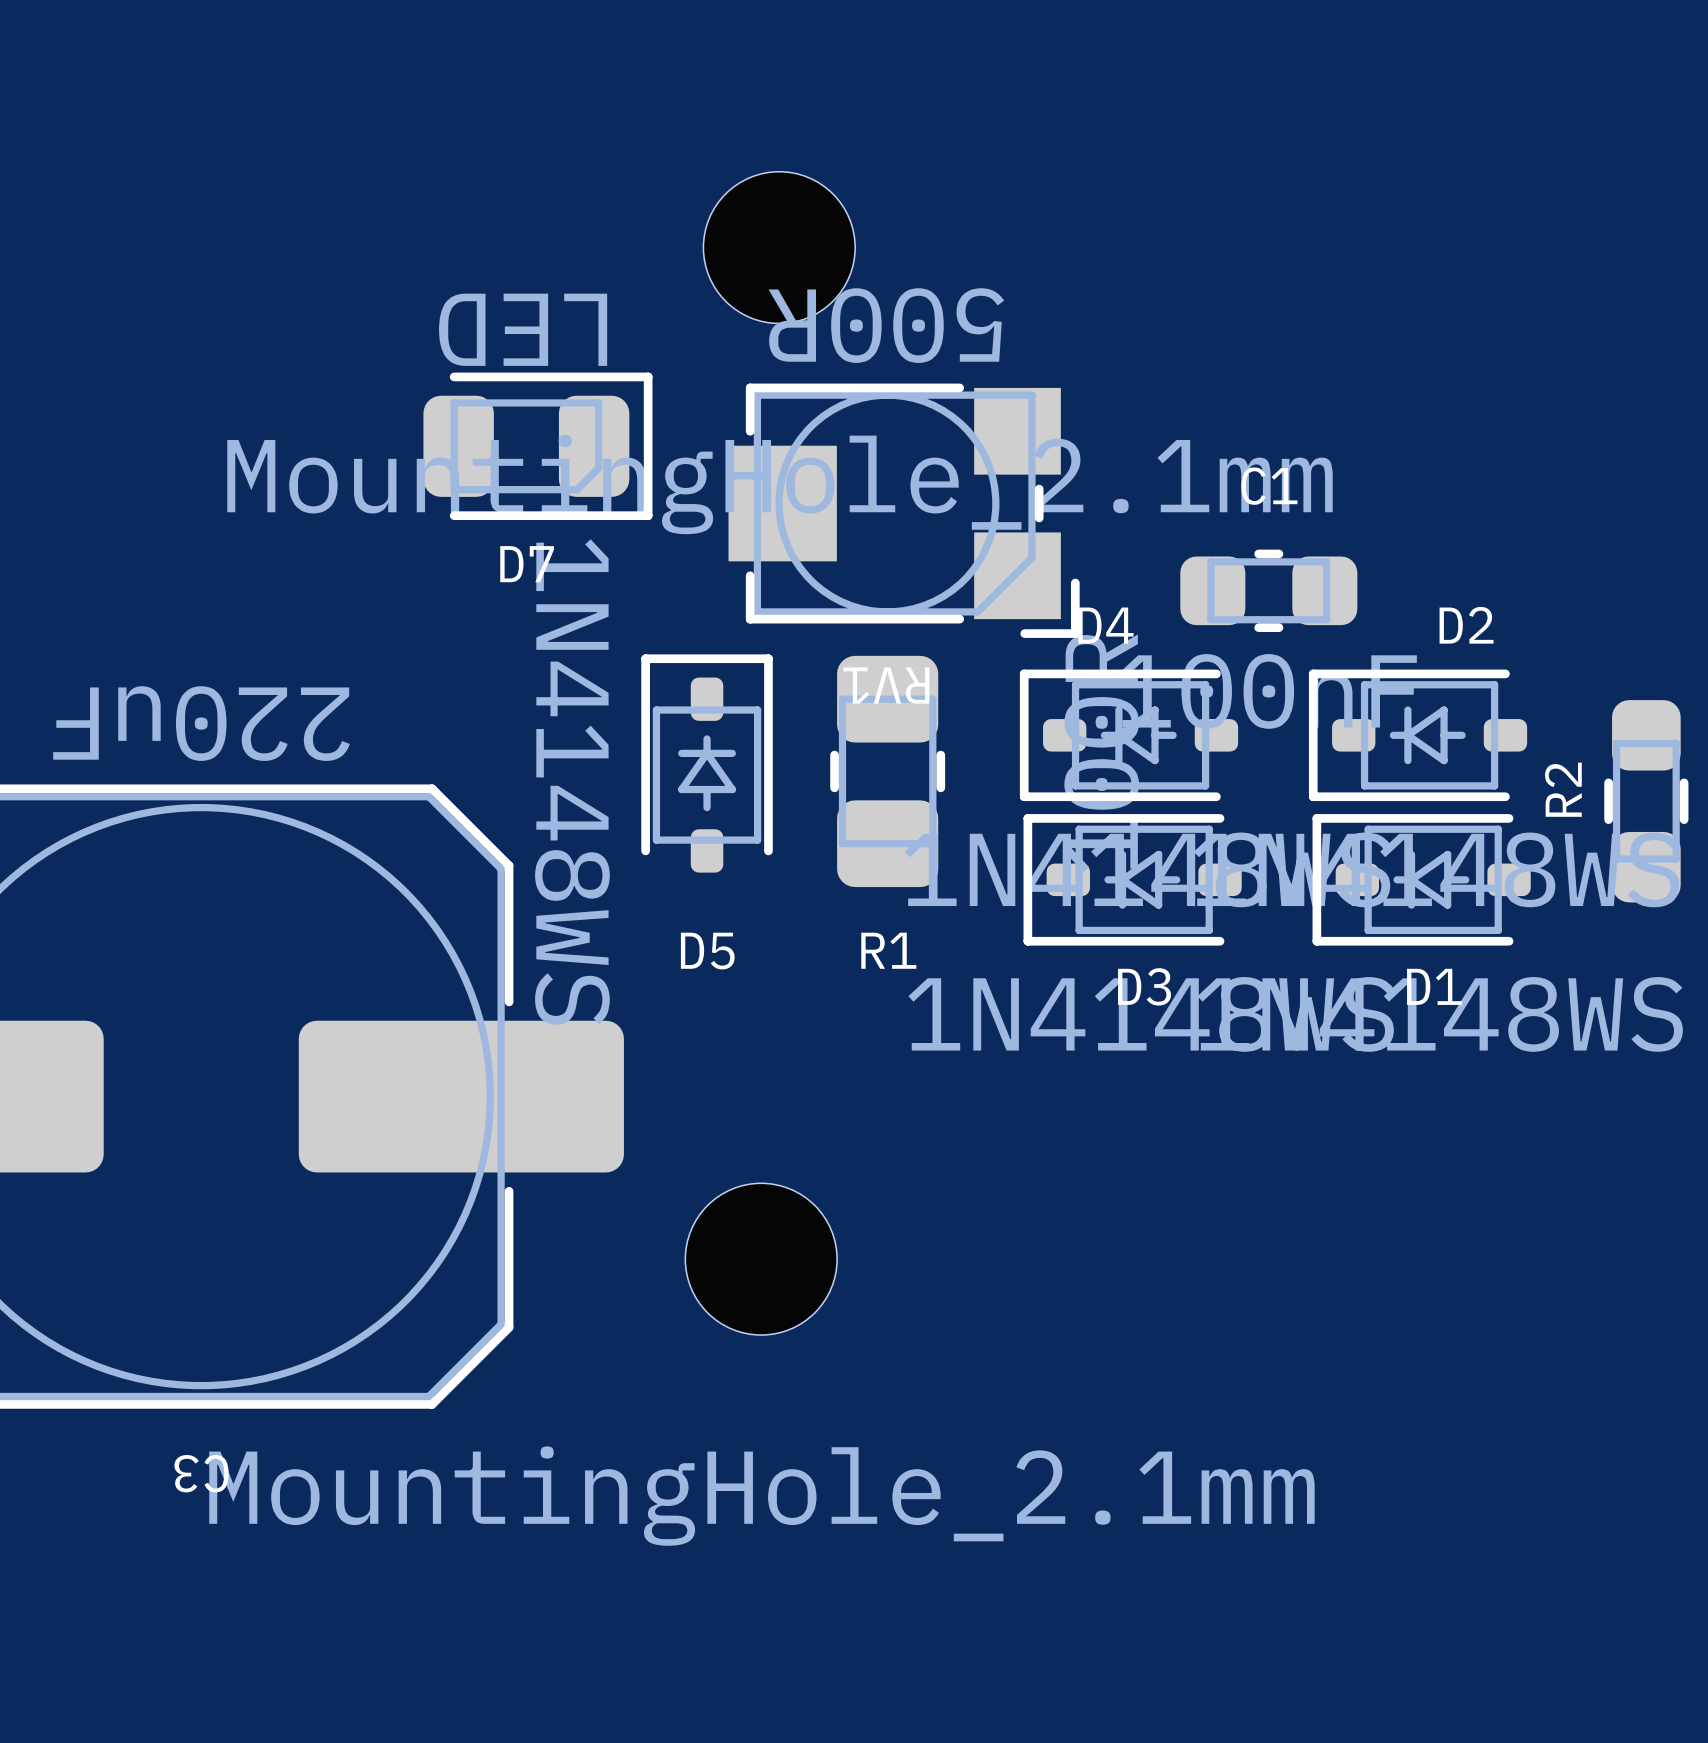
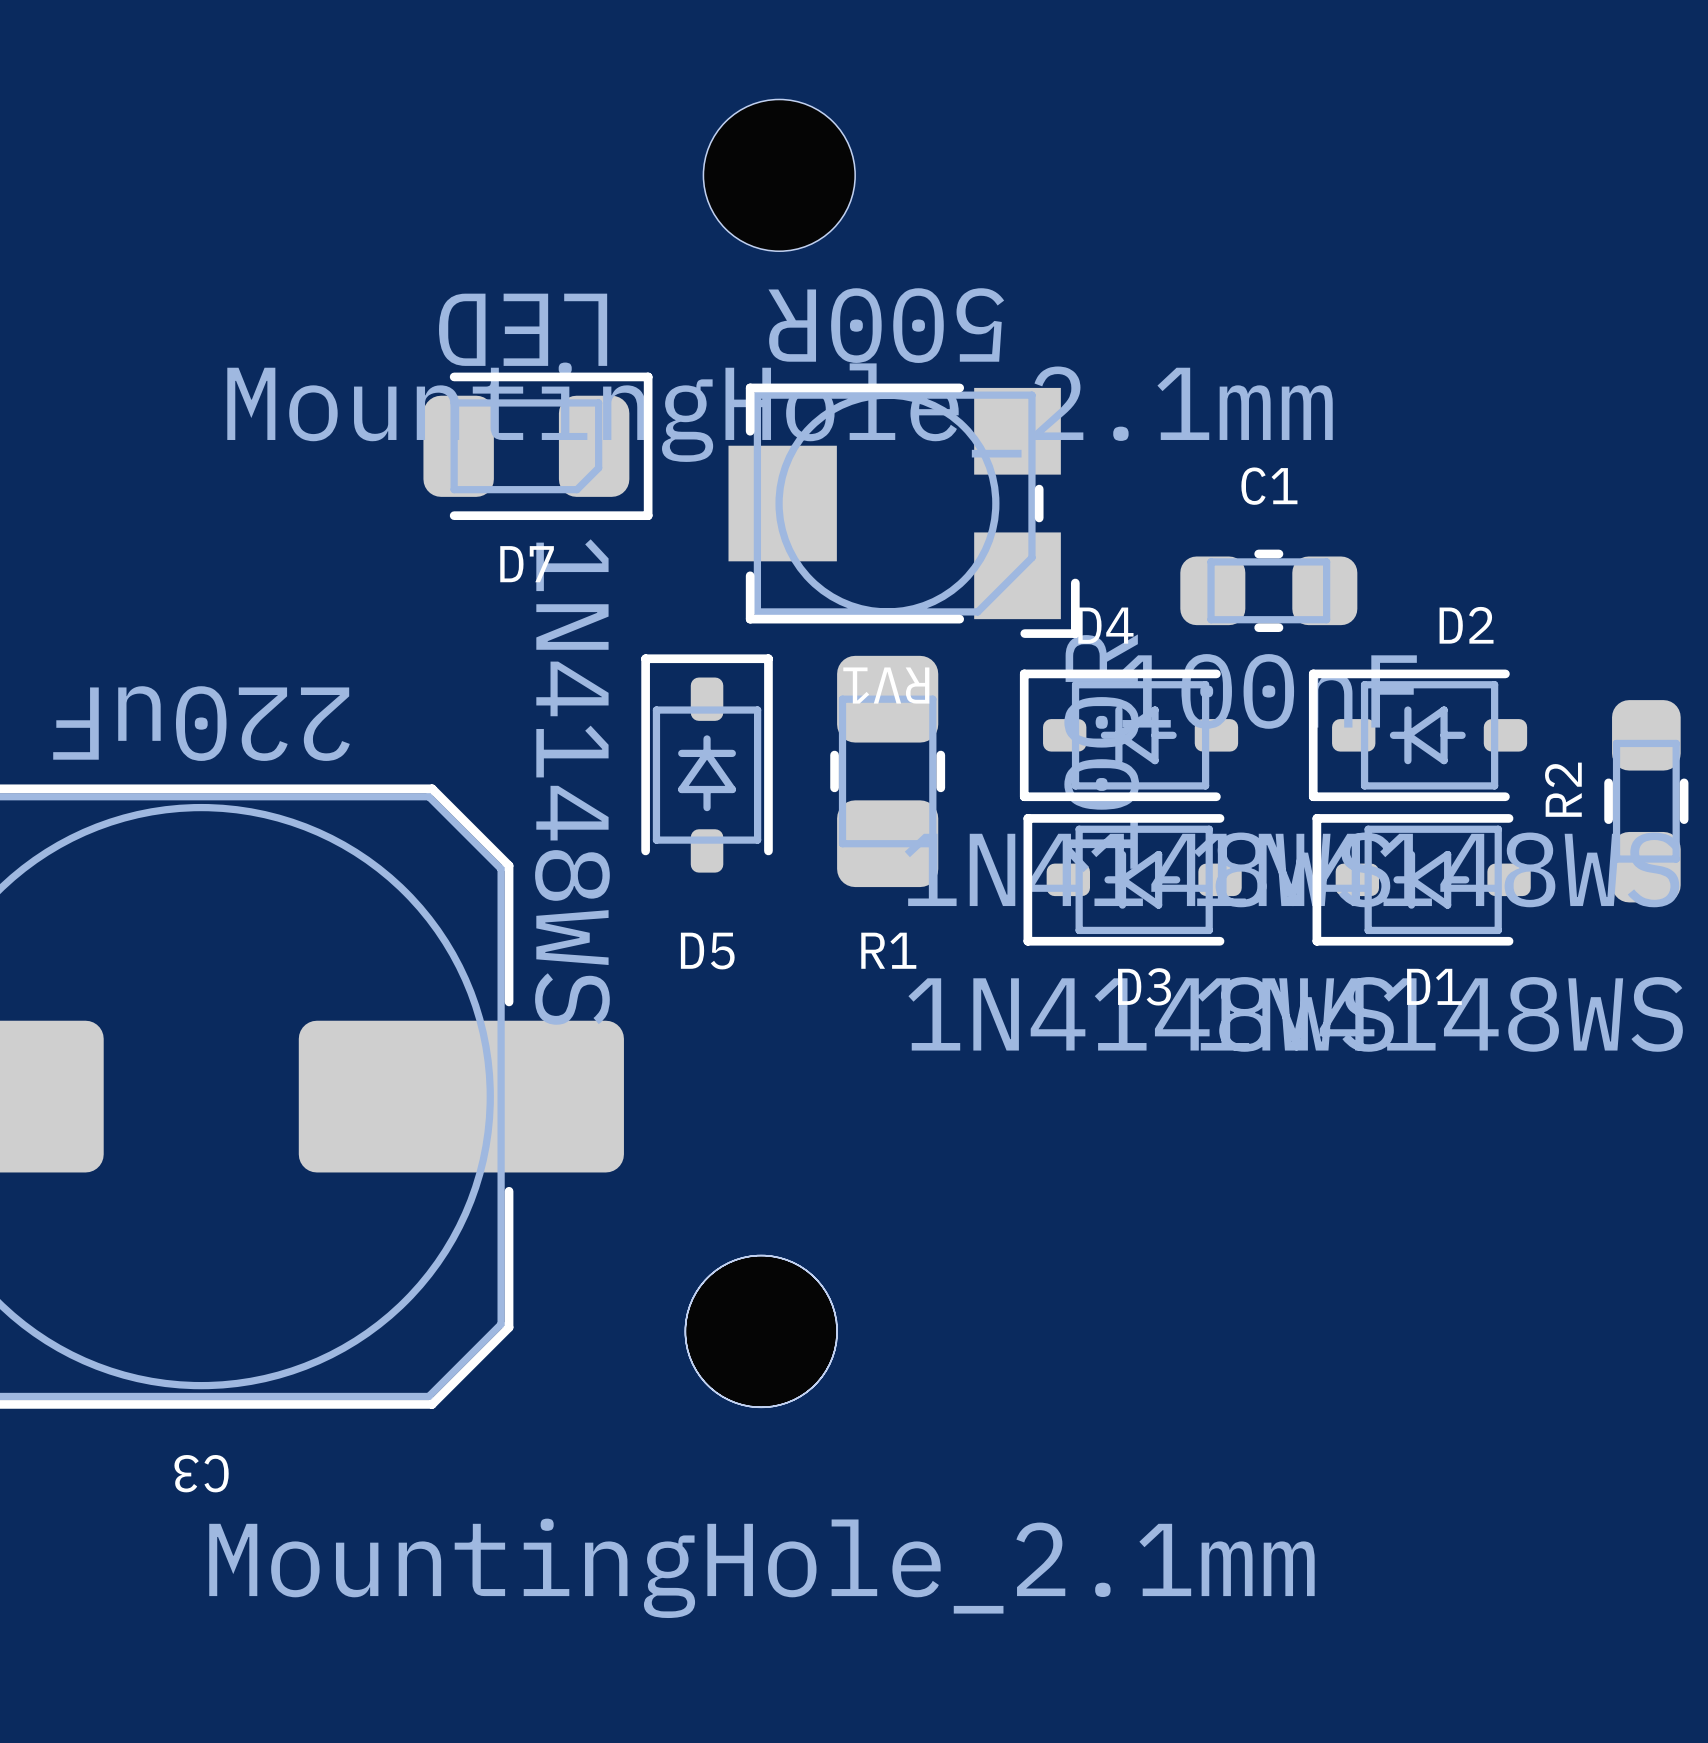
part position: (779, 247) -> (779, 175)
part position: (761, 1259) -> (761, 1331)
part: none -> (761, 1331)

